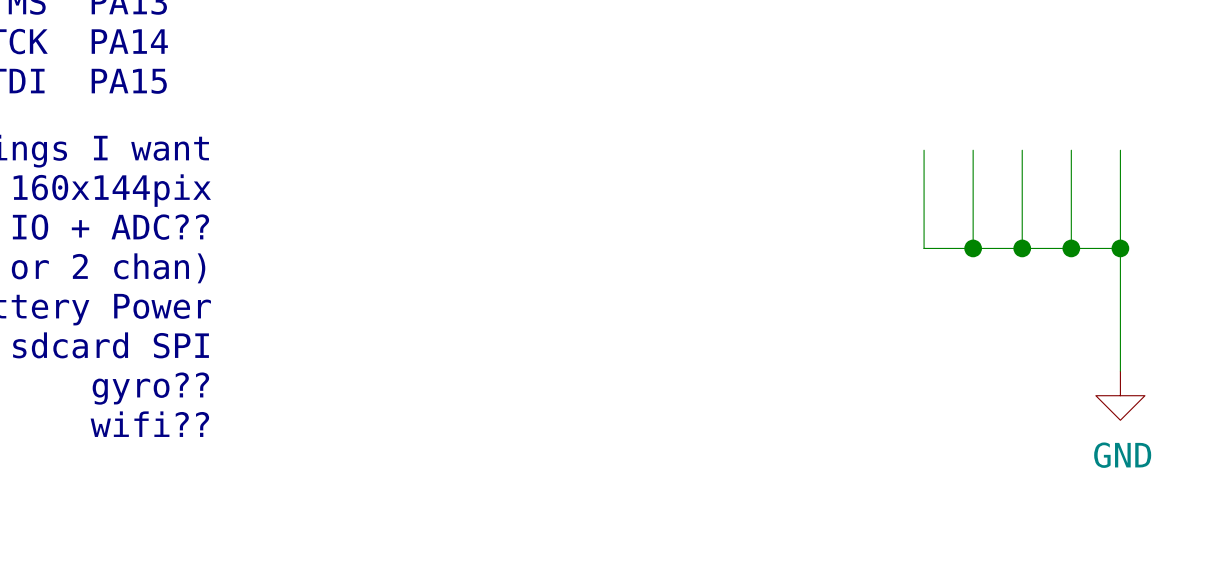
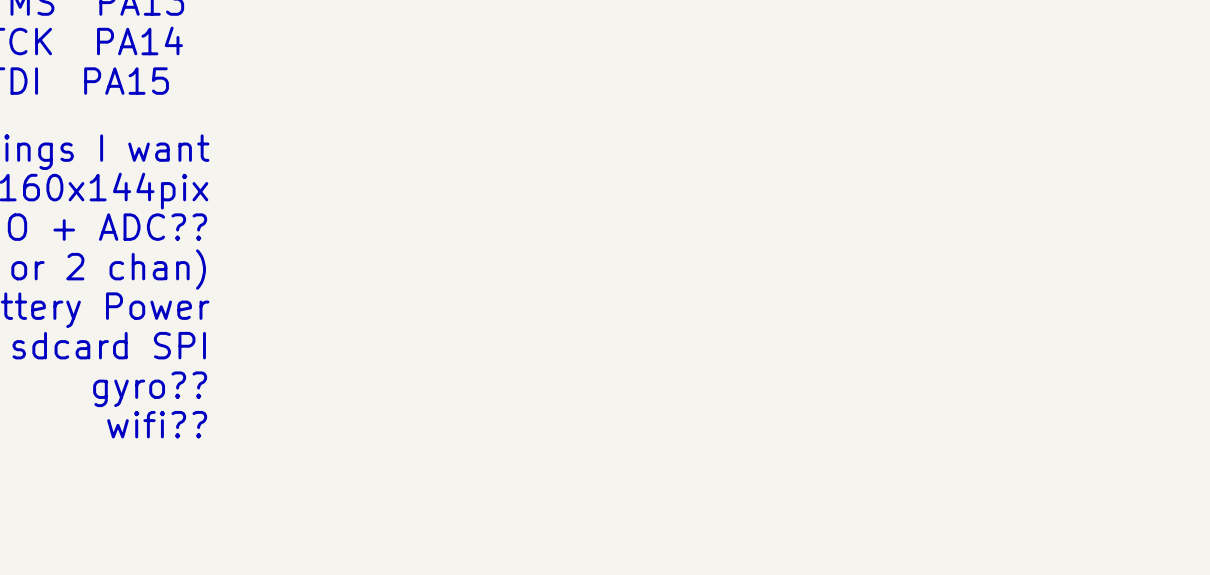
wire: (924, 150) (924, 248) (1120, 248) -> none
wire: (973, 150) (973, 248) -> none
wire: (1022, 150) (1022, 248) -> none
wire: (1071, 150) (1071, 248) -> none
wire: (1120, 150) (1120, 371) -> none
junction: (973, 248) -> none
junction: (1022, 248) -> none
junction: (1071, 248) -> none
junction: (1120, 248) -> none
power symbol: GND (1120, 395) -> none

